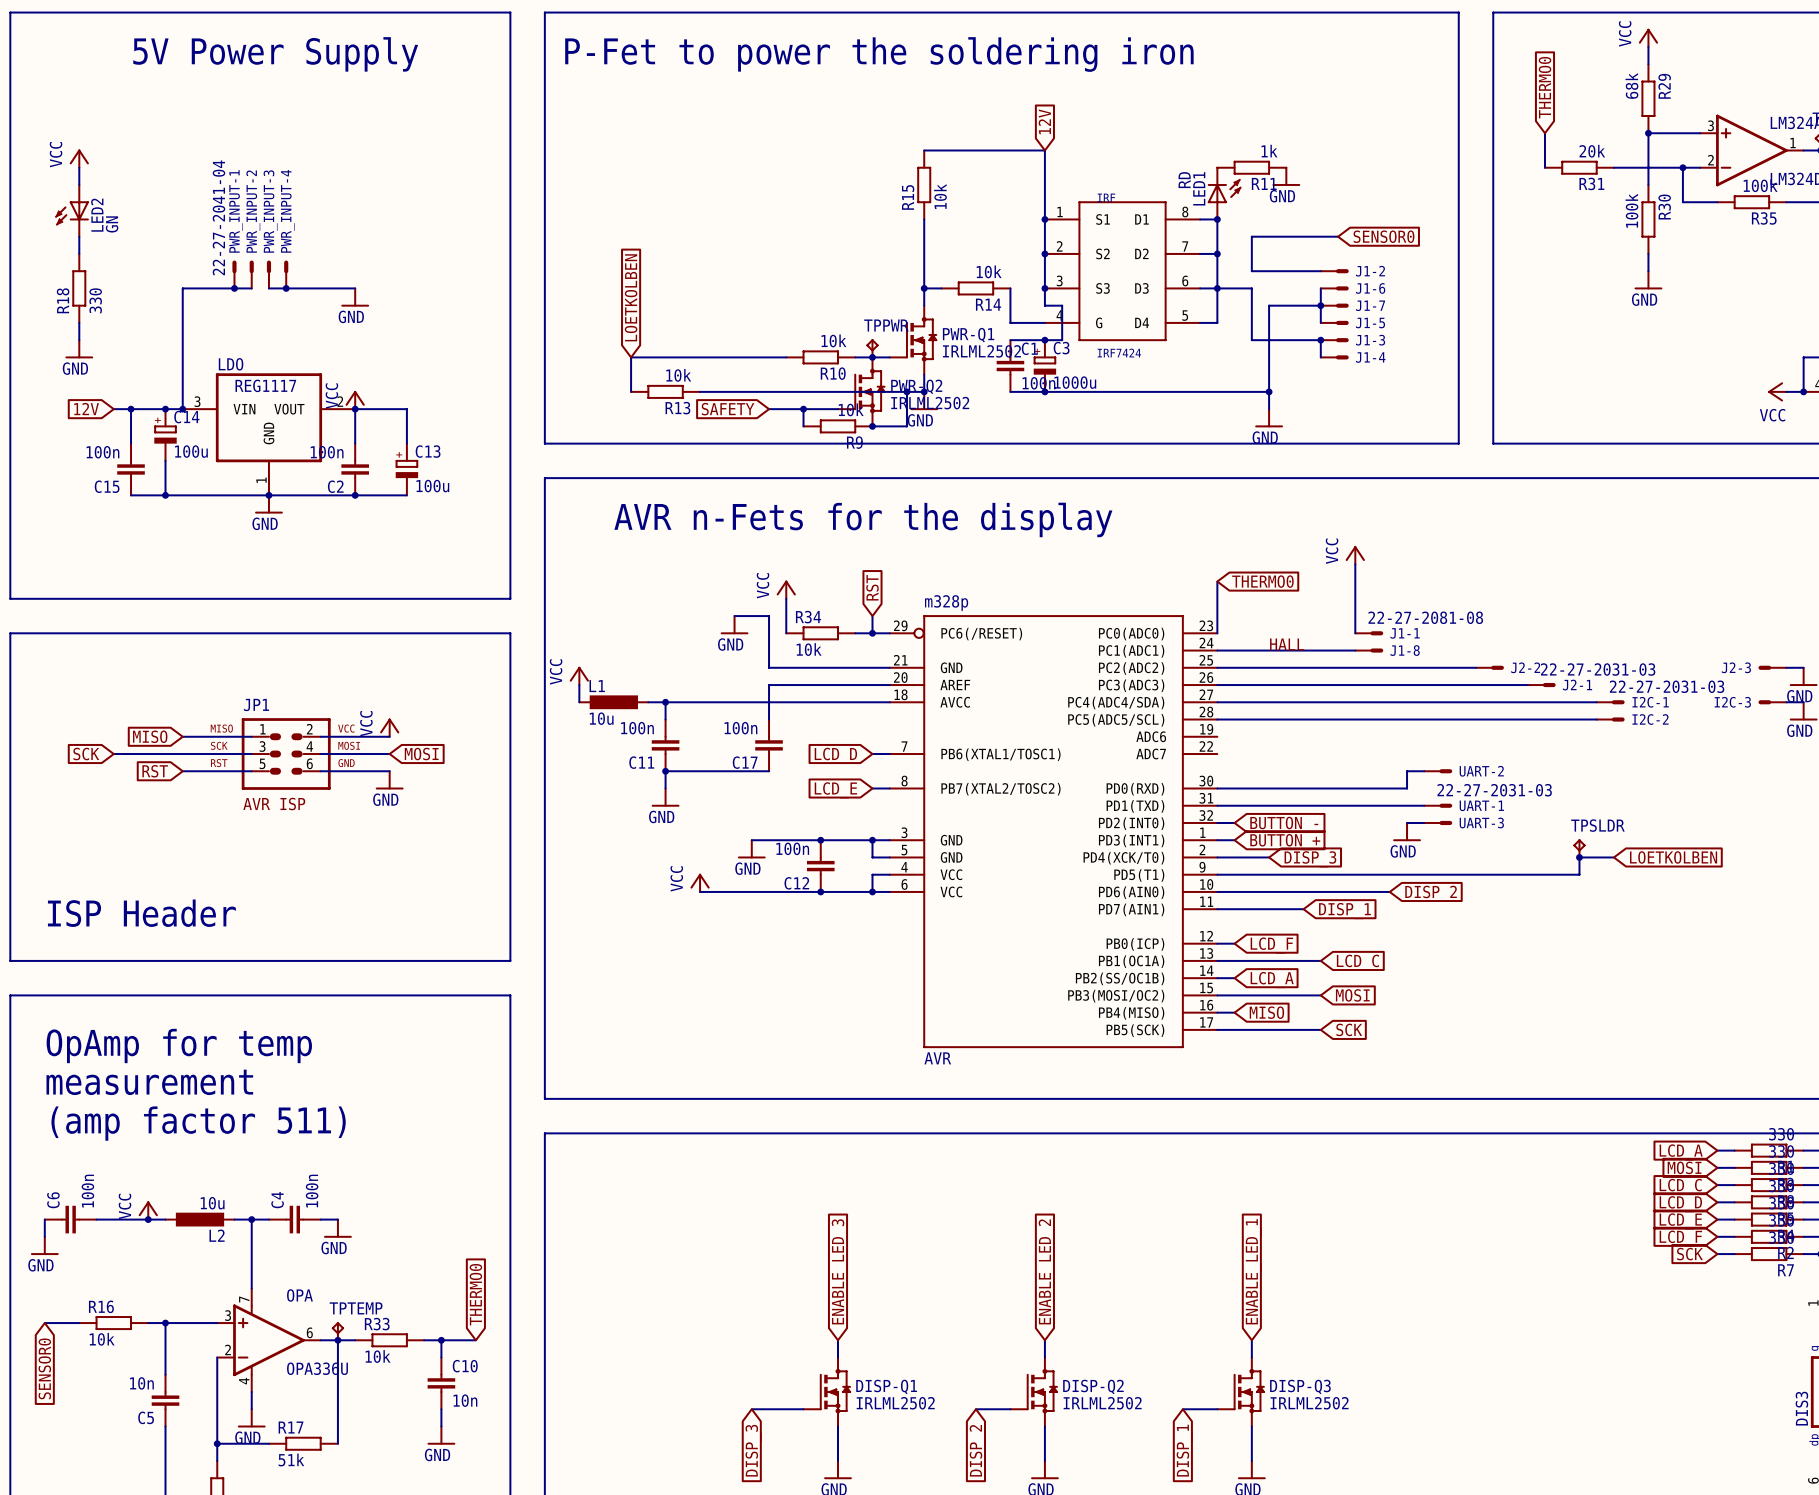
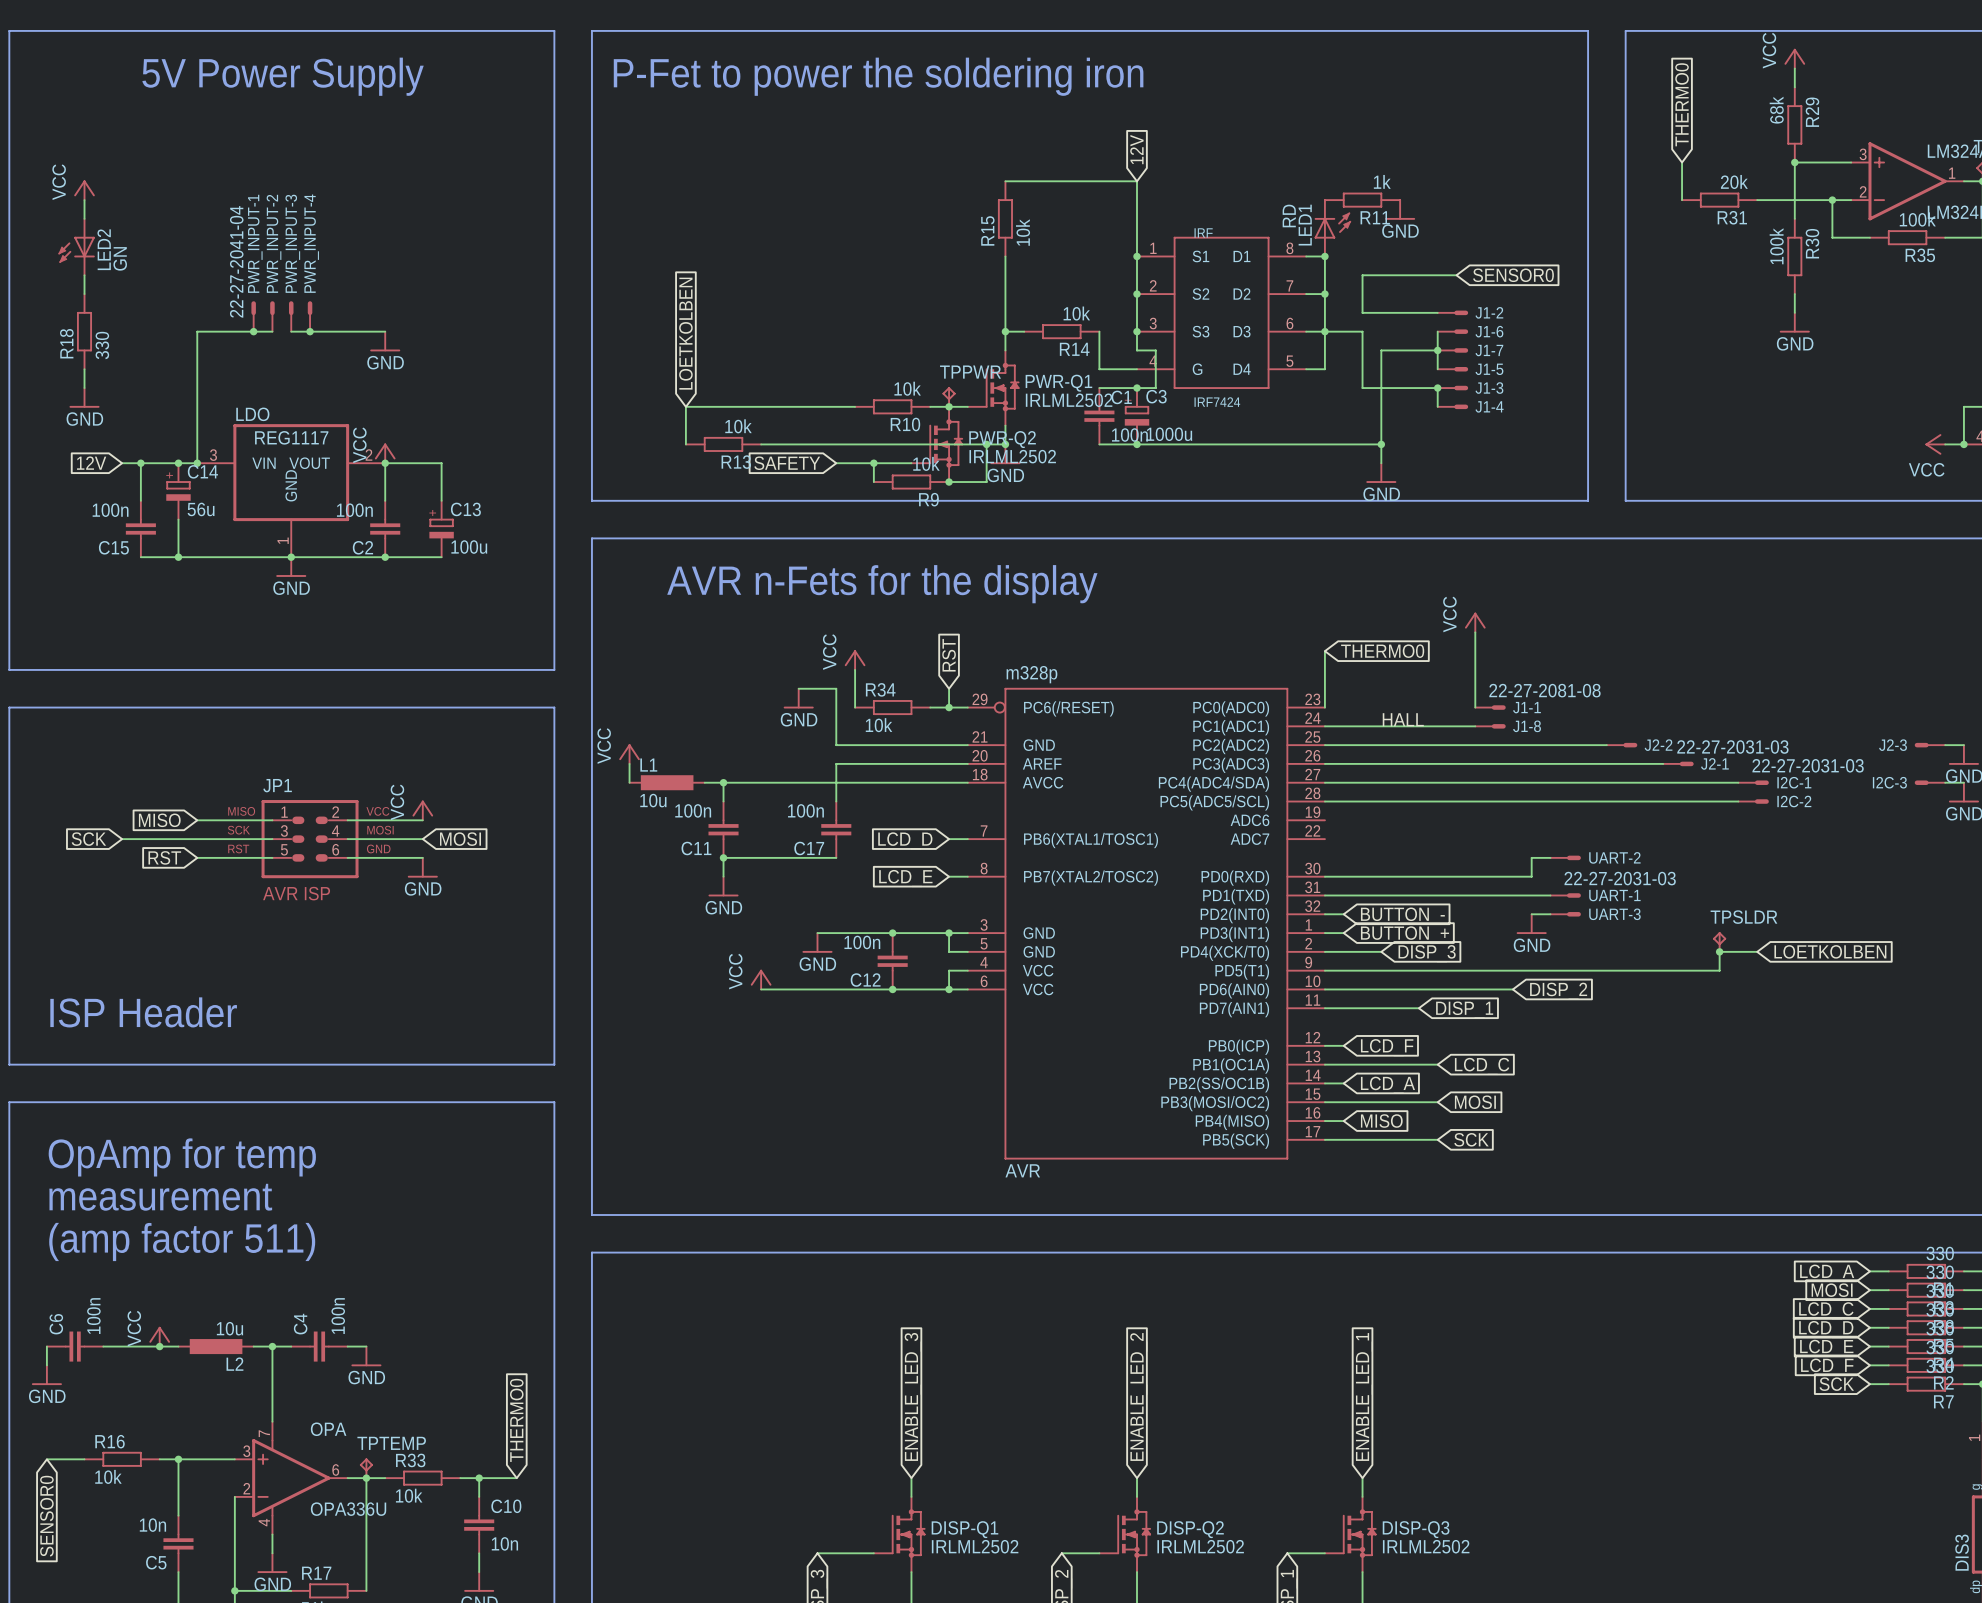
C14 value: 100u (191, 451) -> 56u (201, 509)

